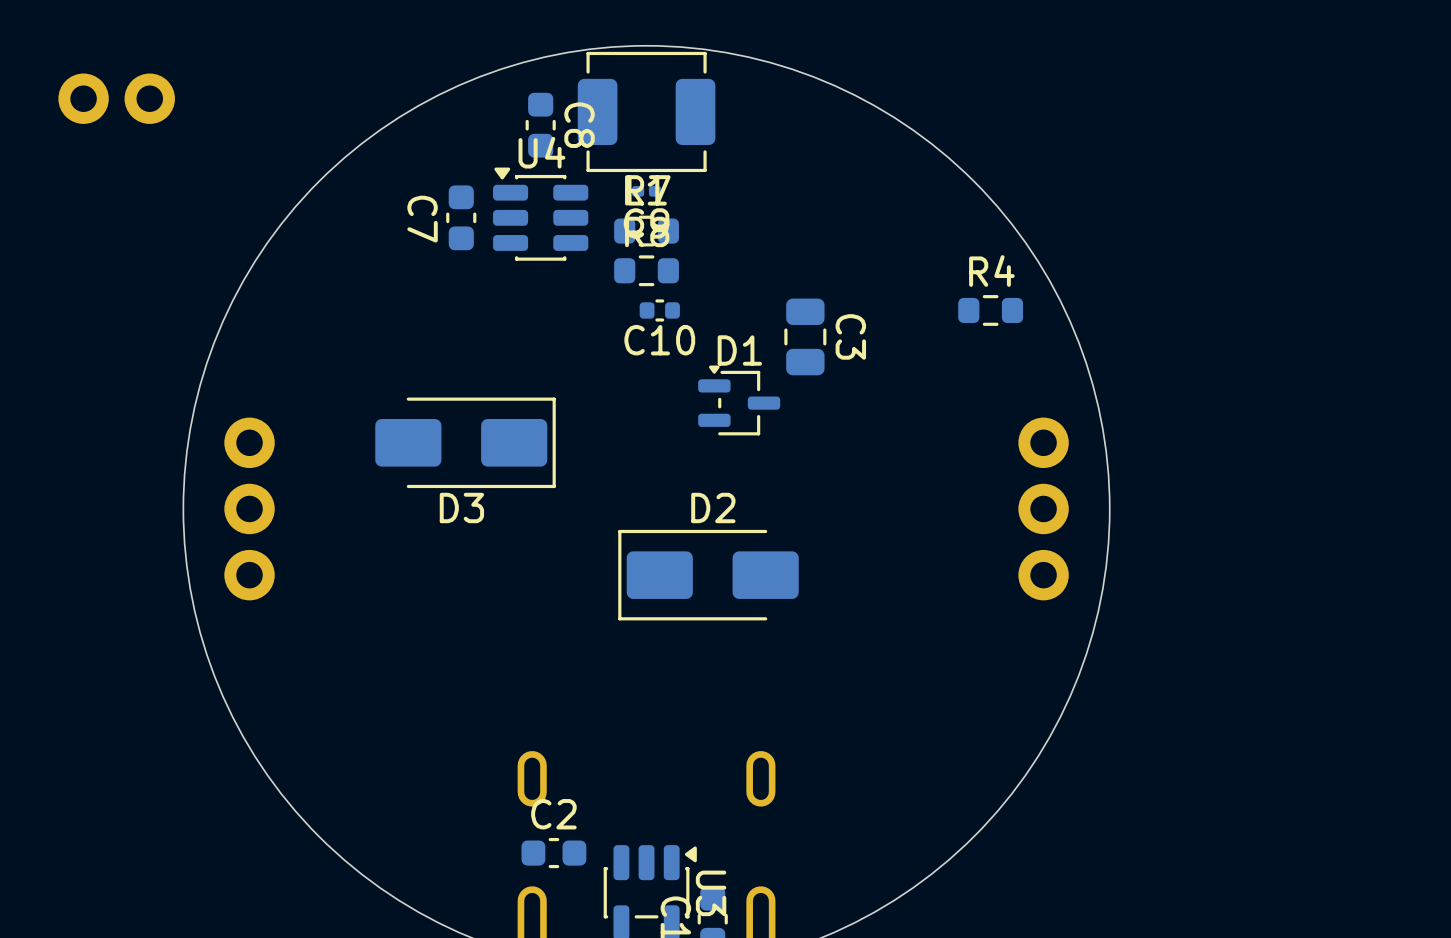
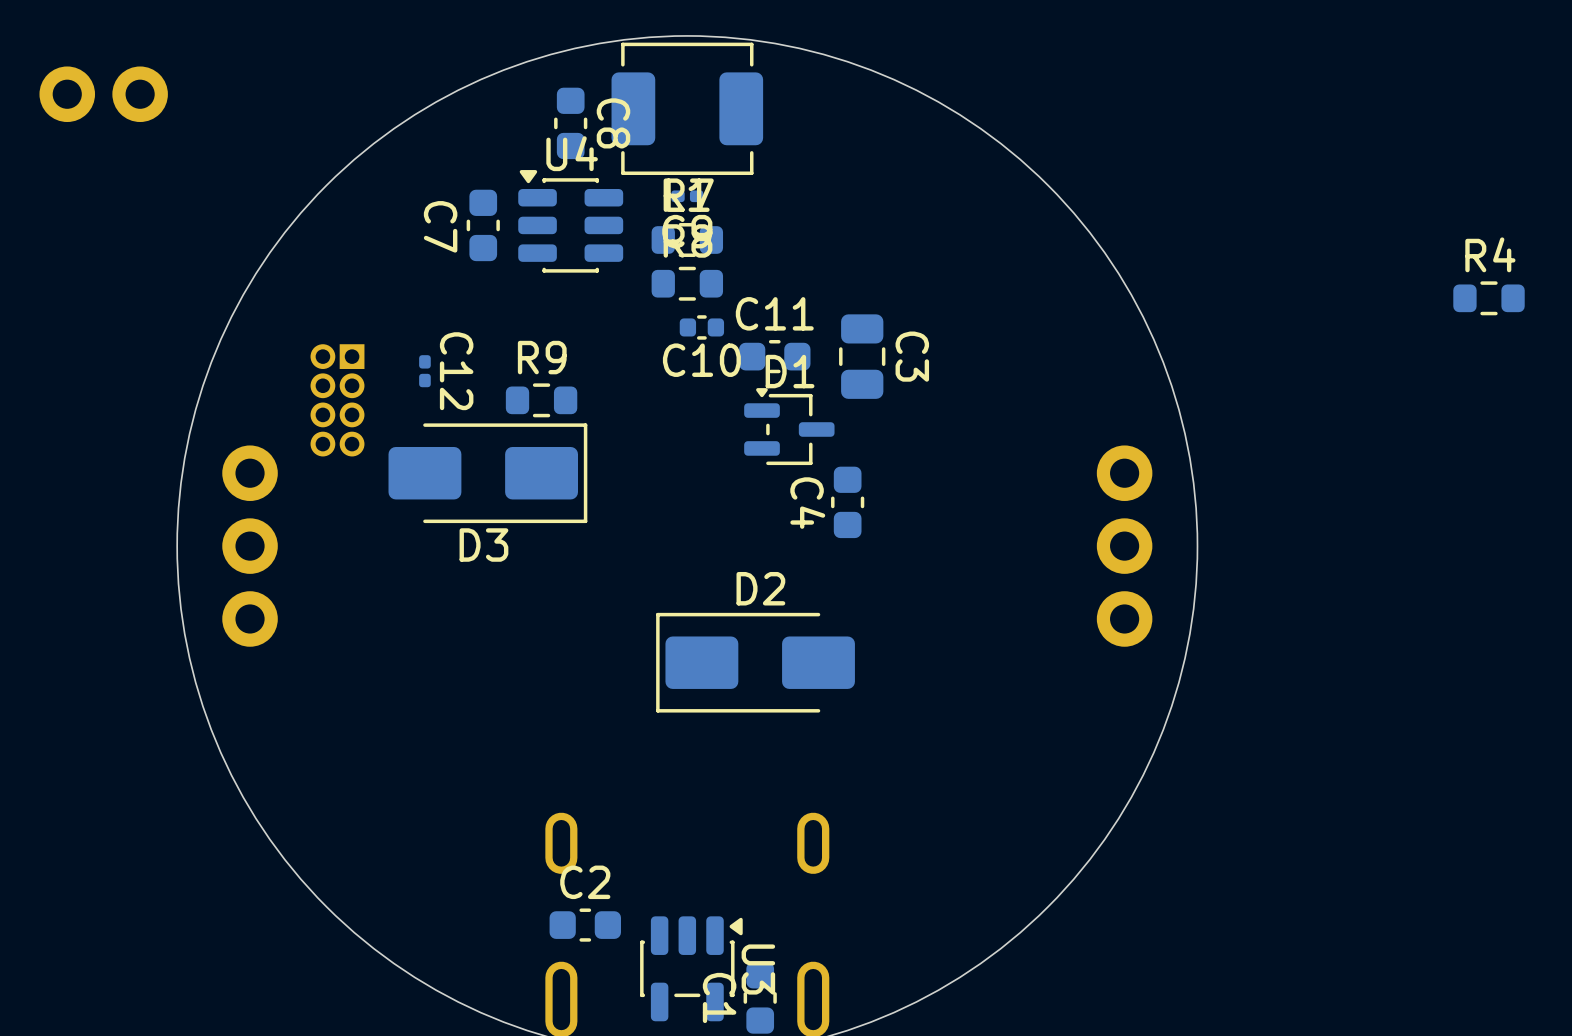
R4 position: (990, 310) -> (1489, 298)
C11: none -> (774, 356)
C12: none -> (424, 371)
part: none -> (337, 400)
R9: none -> (541, 400)
C4: none -> (847, 502)
D2 position: (708, 575) -> (755, 662)

